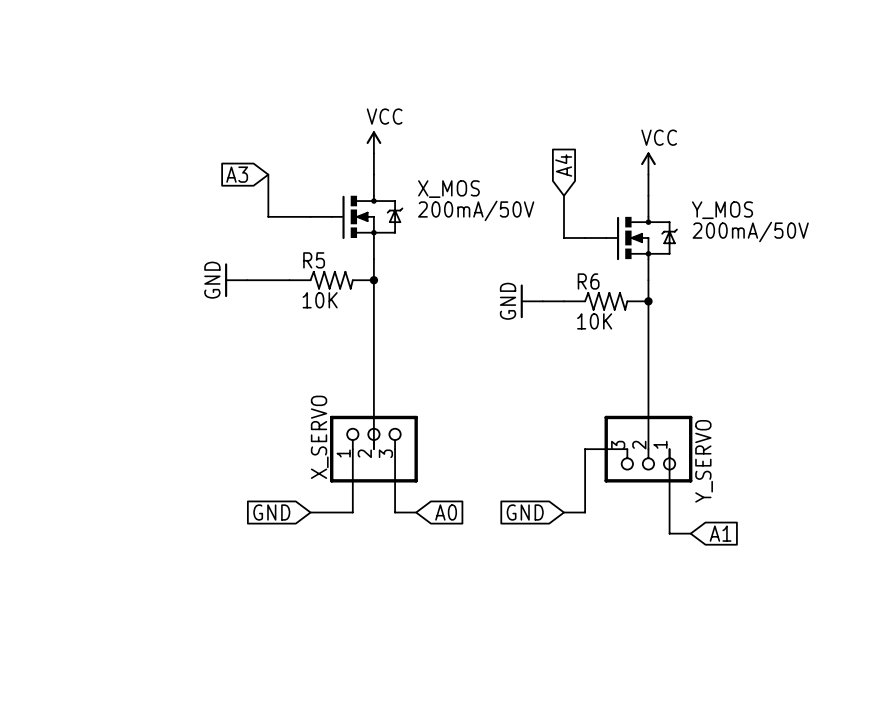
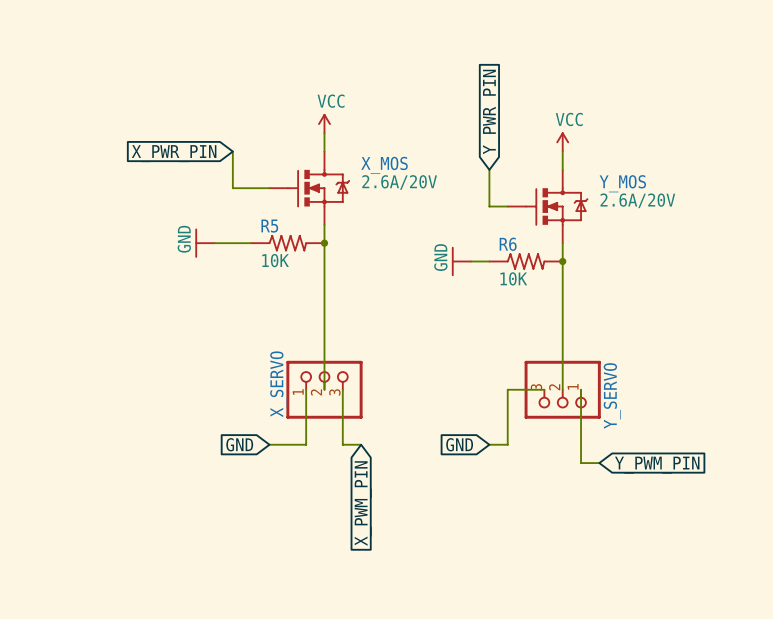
global label: A4 (563, 165) -> Y_PWR_PIN (491, 111)
global label: A3 (237, 174) -> X_PWR_PIN (174, 153)
X_MOS value: 200mA/50V (476, 210) -> 2.6A/20V (399, 182)
Y_MOS value: 200mA/50V (750, 232) -> 2.6A/20V (637, 200)
global label: A0 (446, 512) -> X_PWM_PIN (363, 503)
global label: A1 (720, 533) -> Y_PWM_PIN (657, 465)

